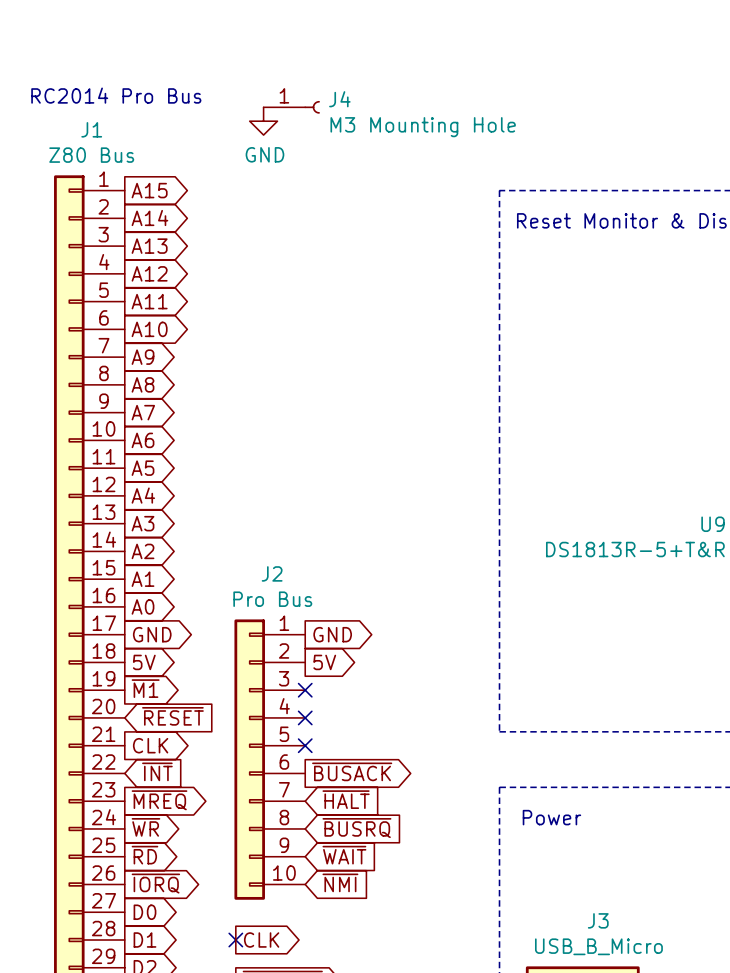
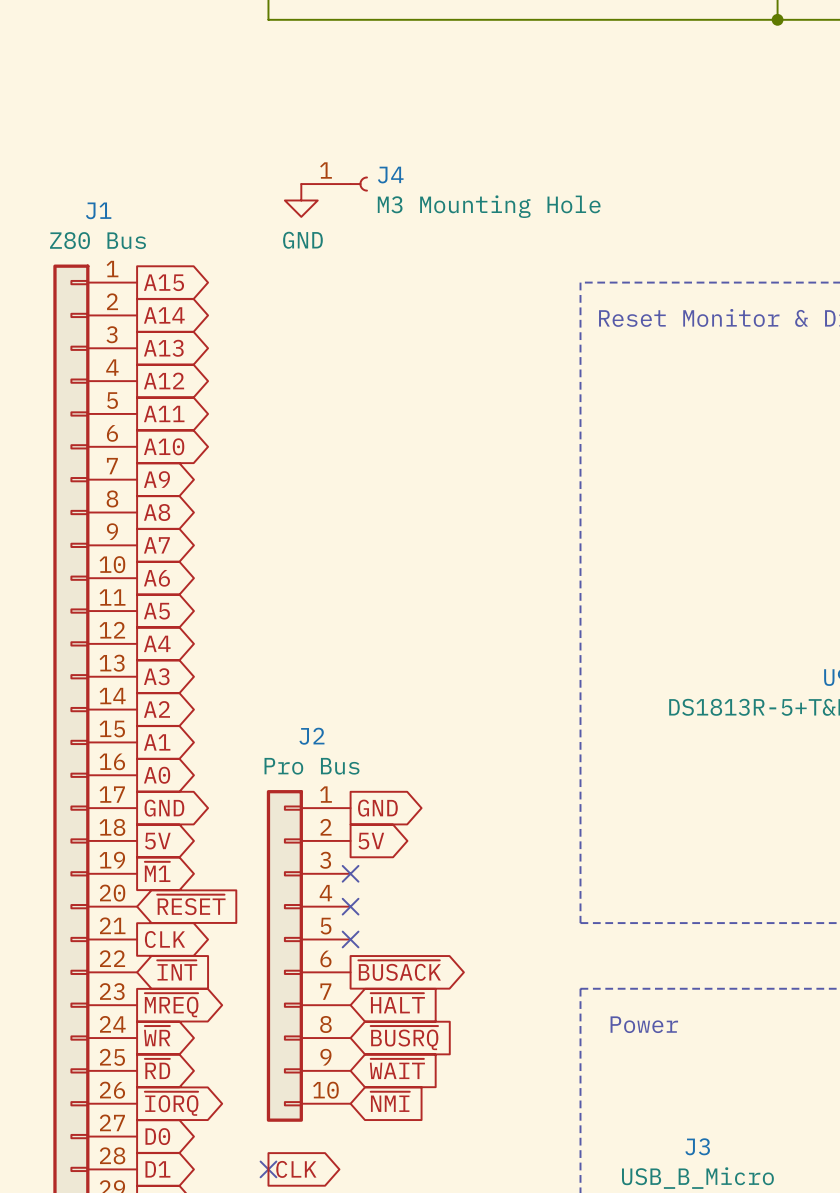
text: RC2014 Pro Bus (116, 95) -> none

